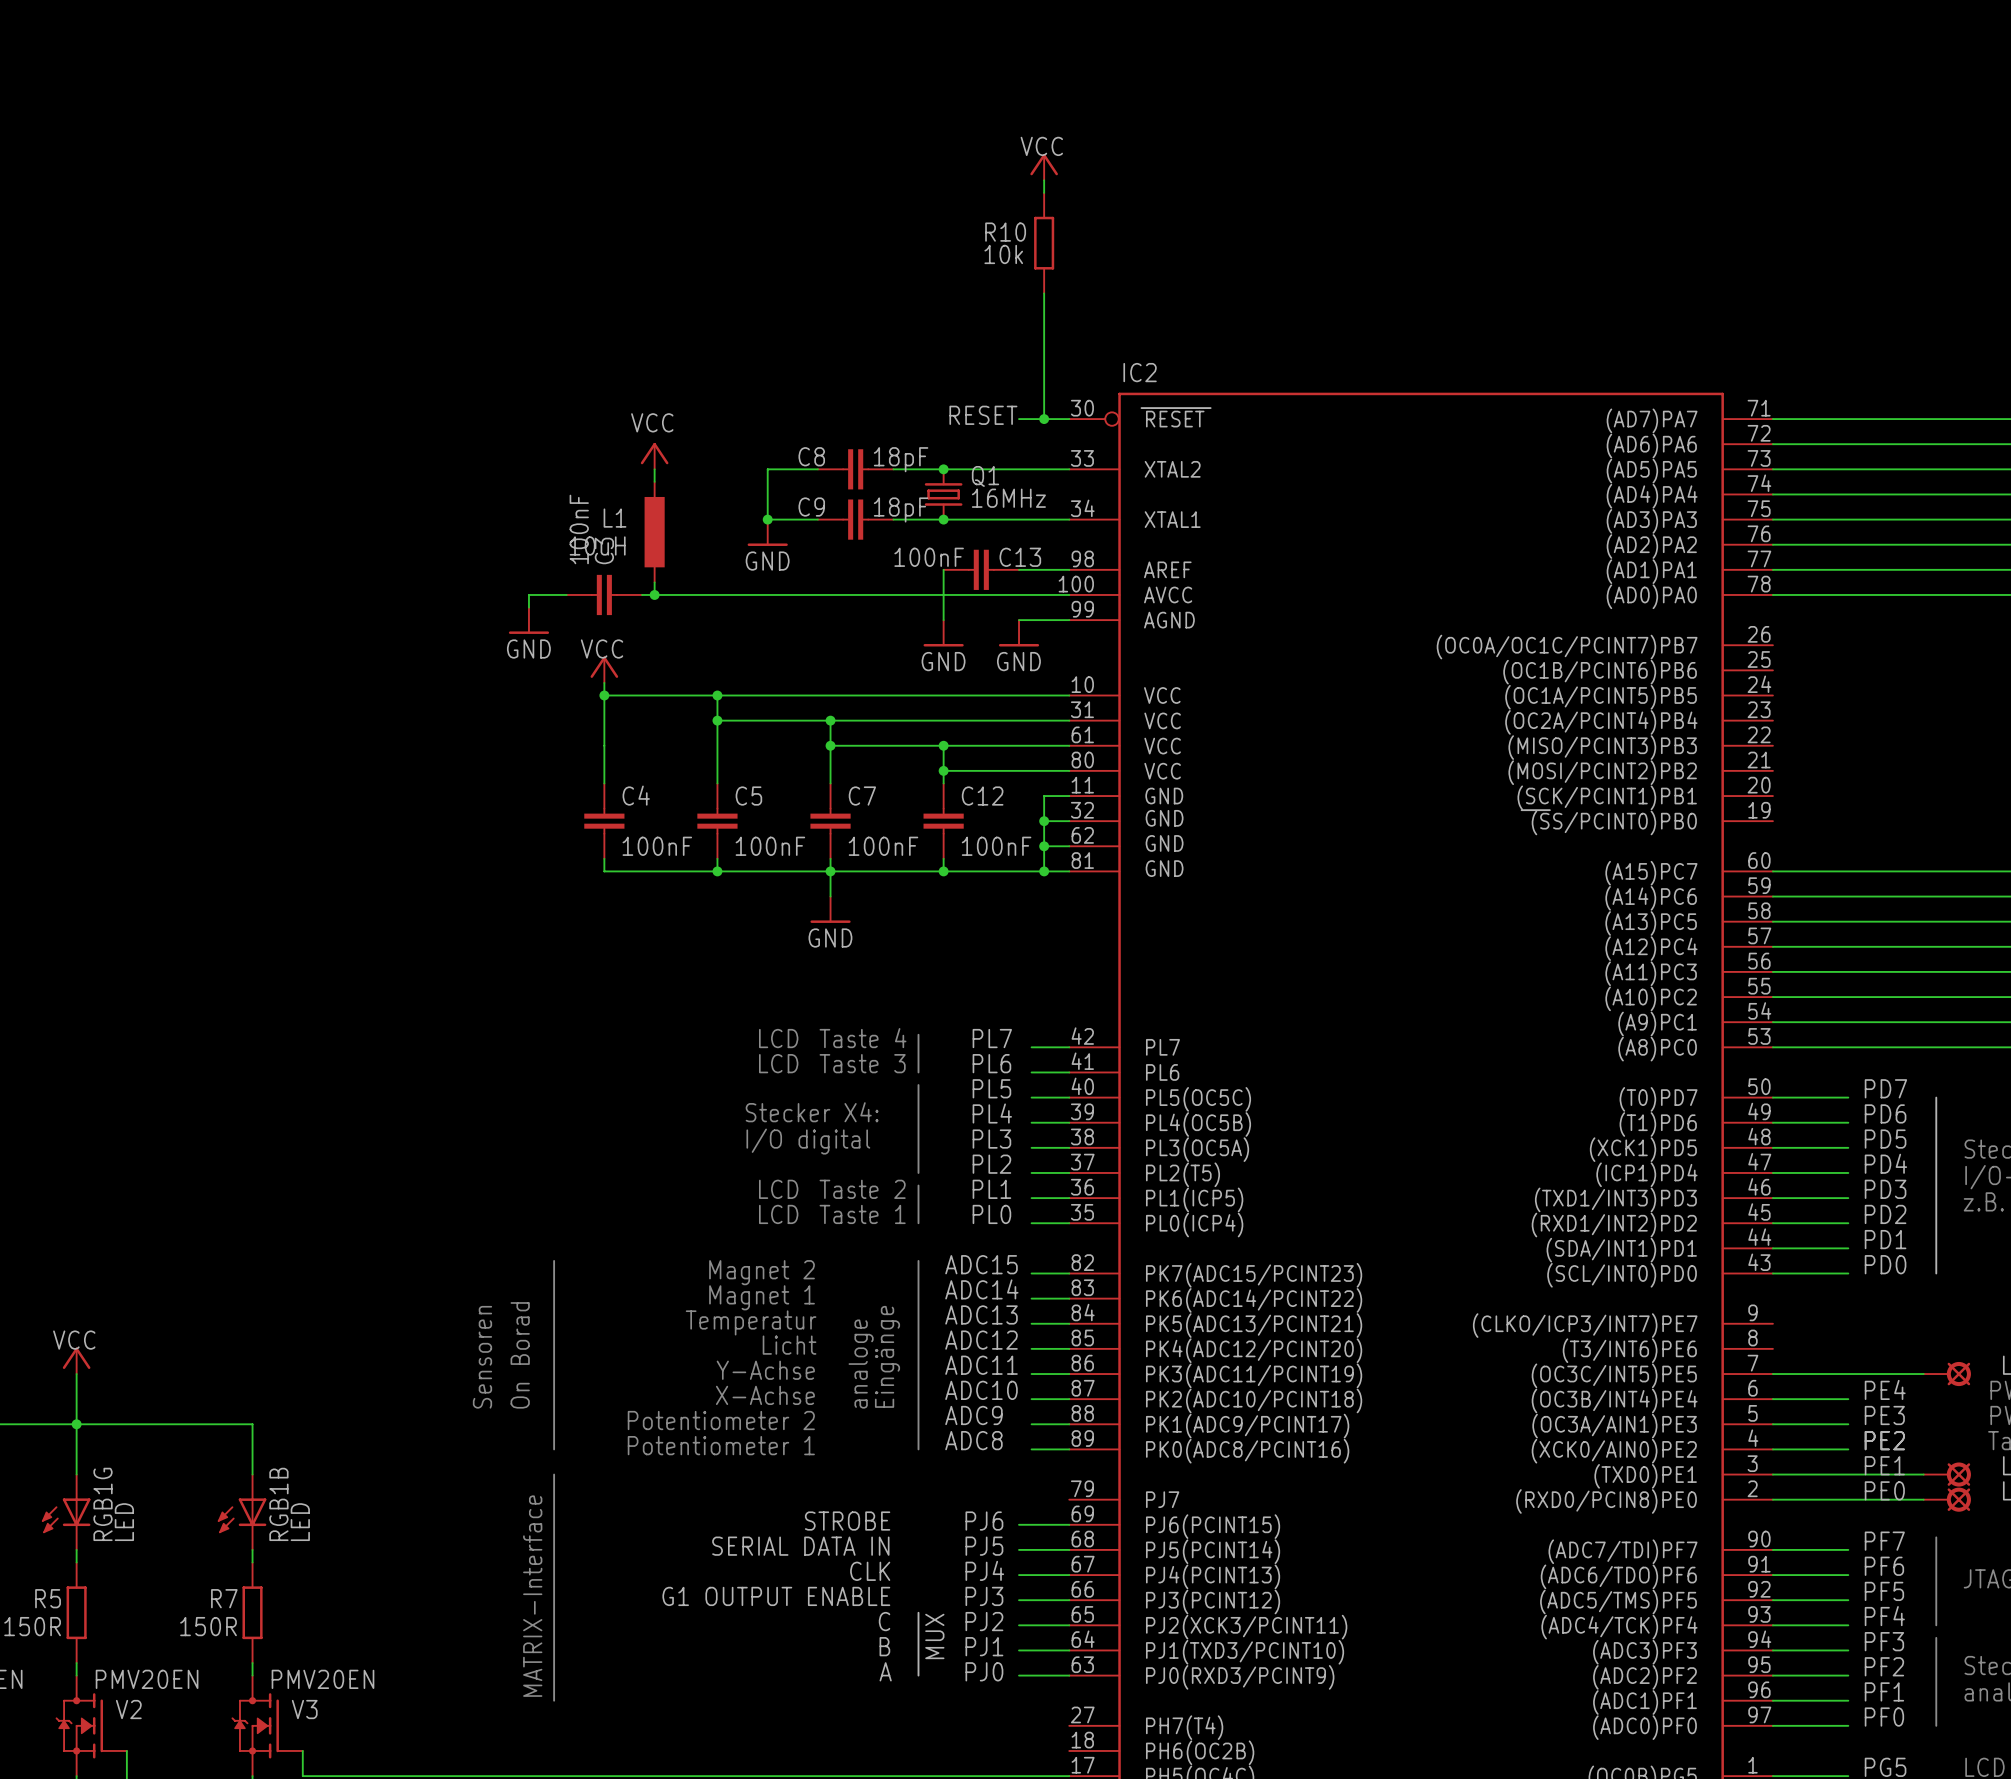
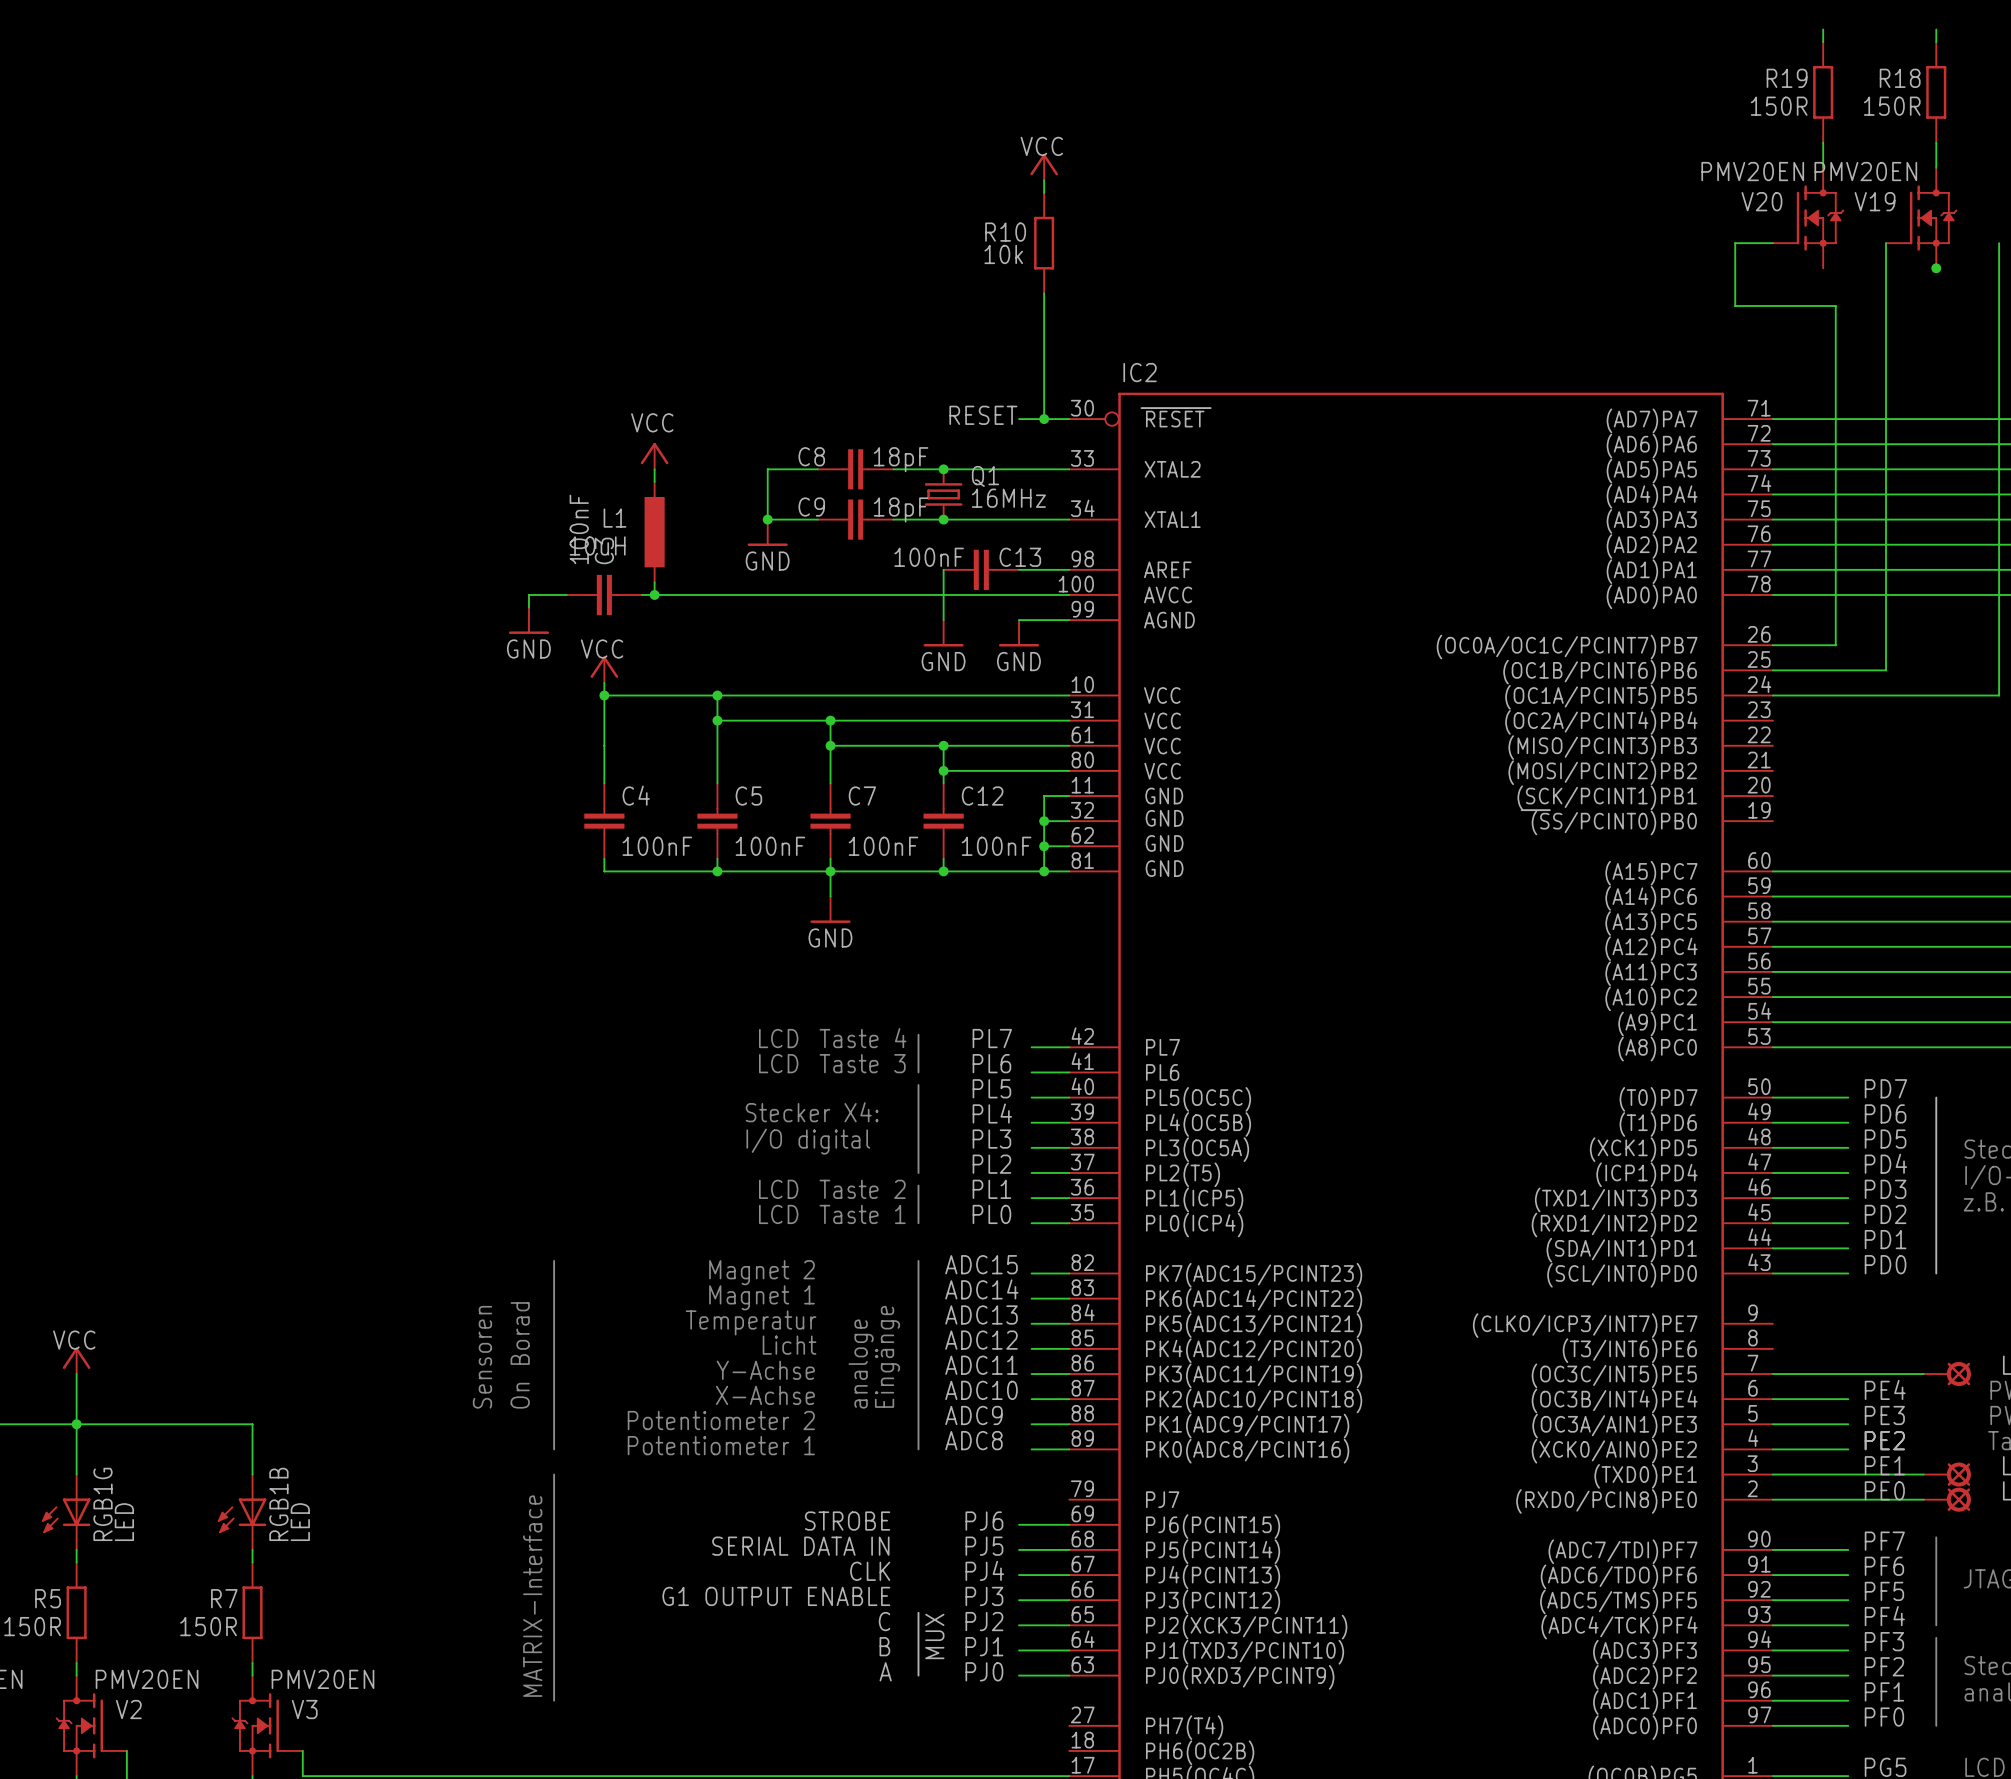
wire: none -> (1823, 29) (1823, 42)
wire: none -> (1936, 29) (1936, 42)
R19: none -> 150R (1823, 92)
R18: none -> 150R (1936, 92)
wire: none -> (1823, 142) (1823, 167)
wire: none -> (1936, 142) (1936, 167)
V20: none -> PMV20EN (1808, 218)
V19: none -> PMV20EN (1921, 218)
wire: none -> (1772, 243) (1735, 243) (1735, 305) (1835, 305) (1835, 645) (1772, 645)
wire: none -> (1886, 243) (1886, 670) (1772, 670)
wire: none -> (1999, 243) (1999, 695) (1772, 695)
junction: none -> (1936, 268)

